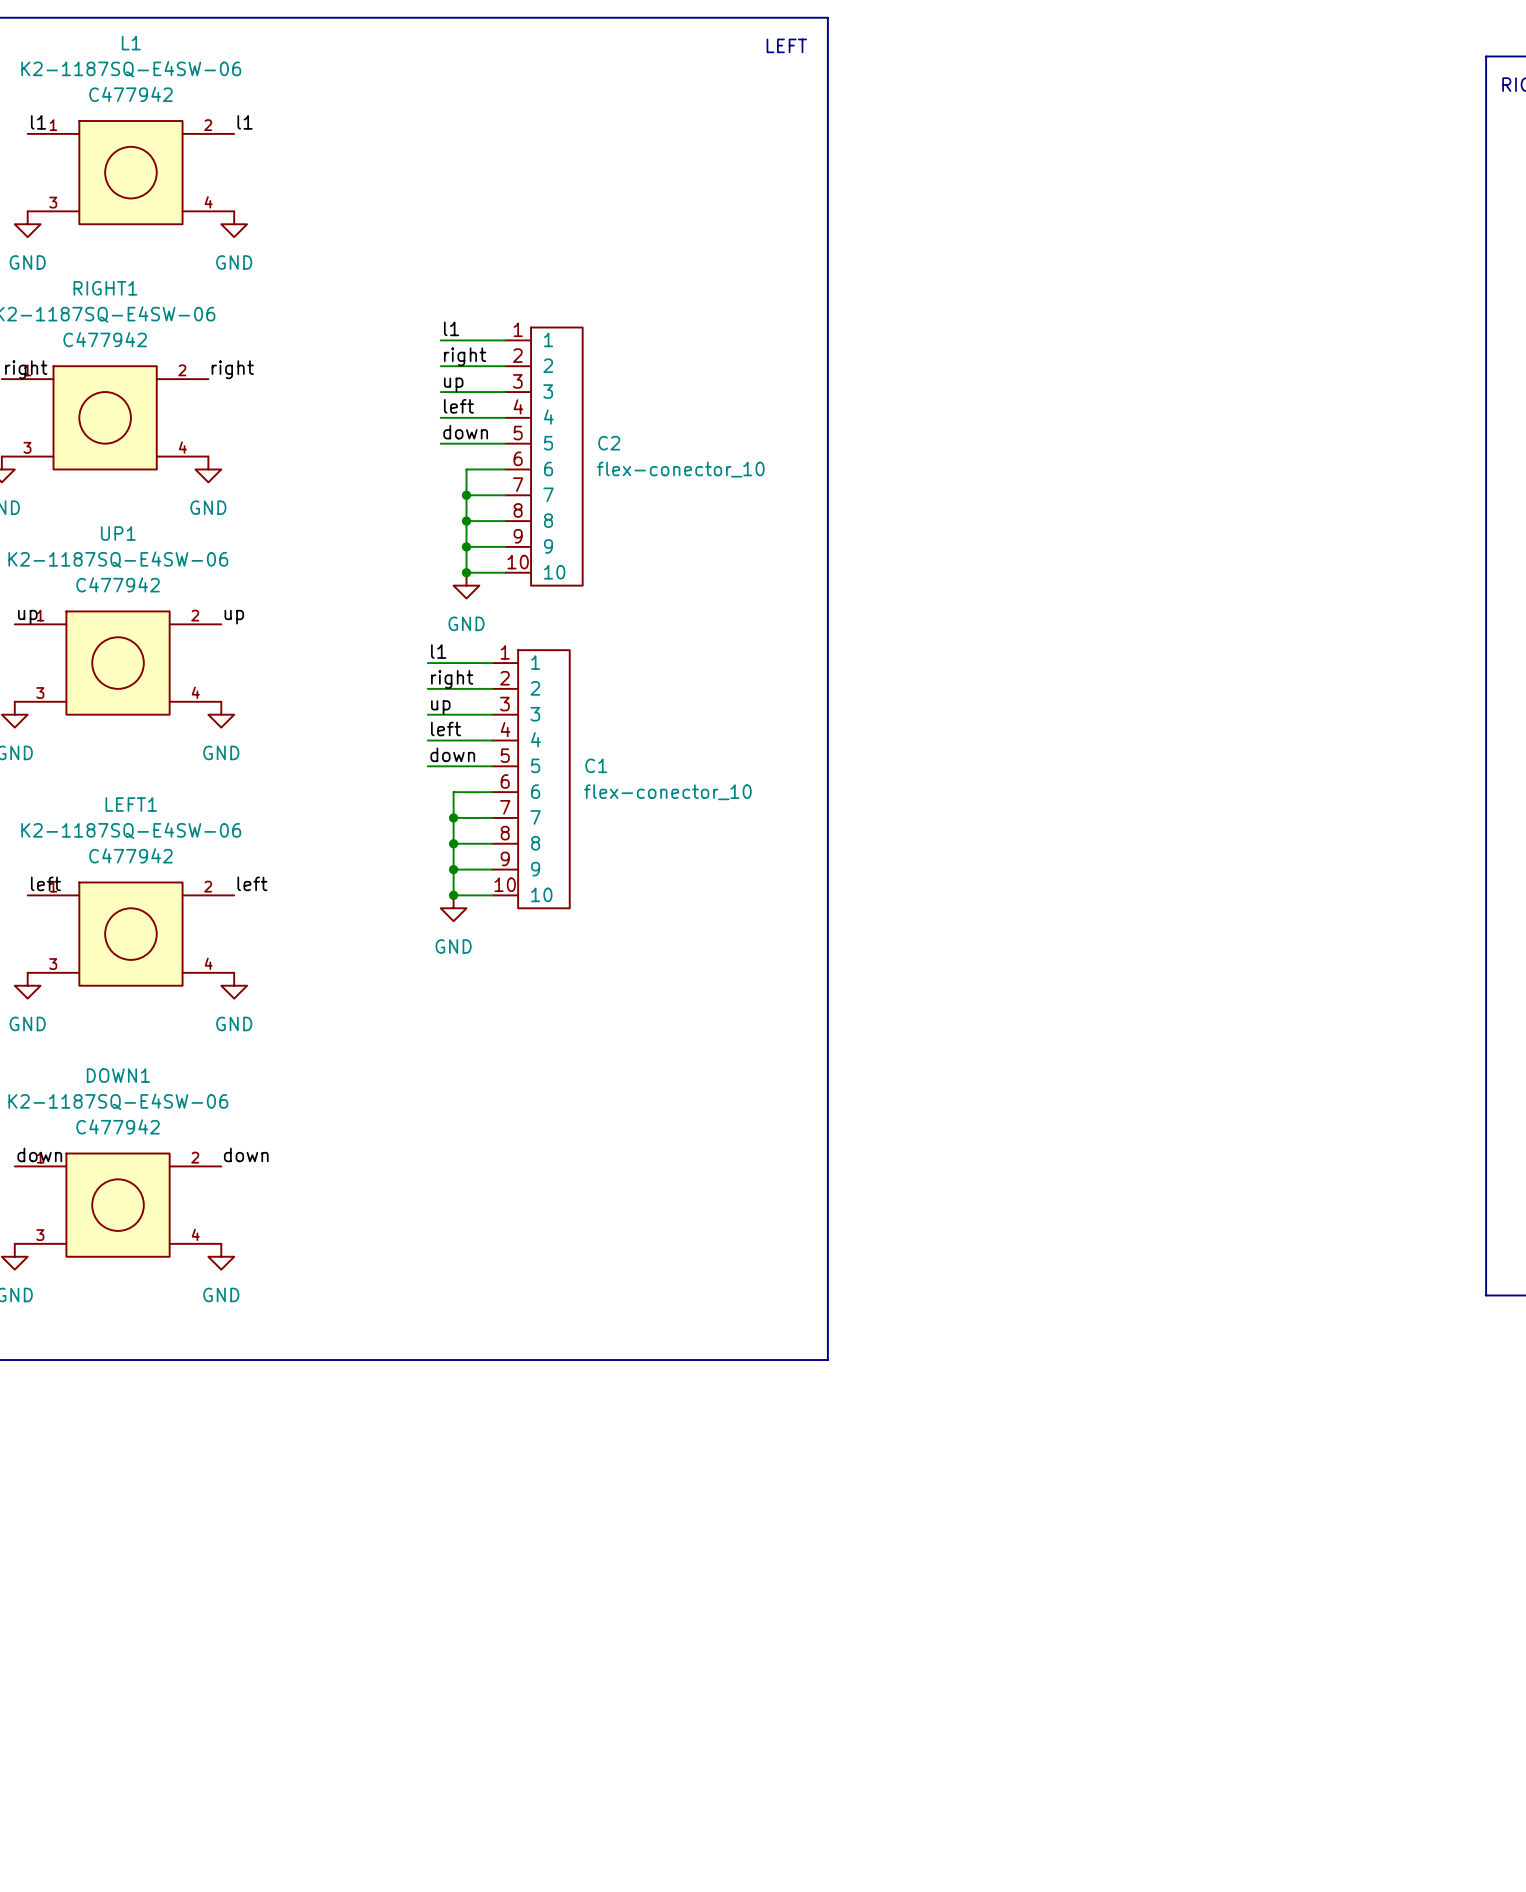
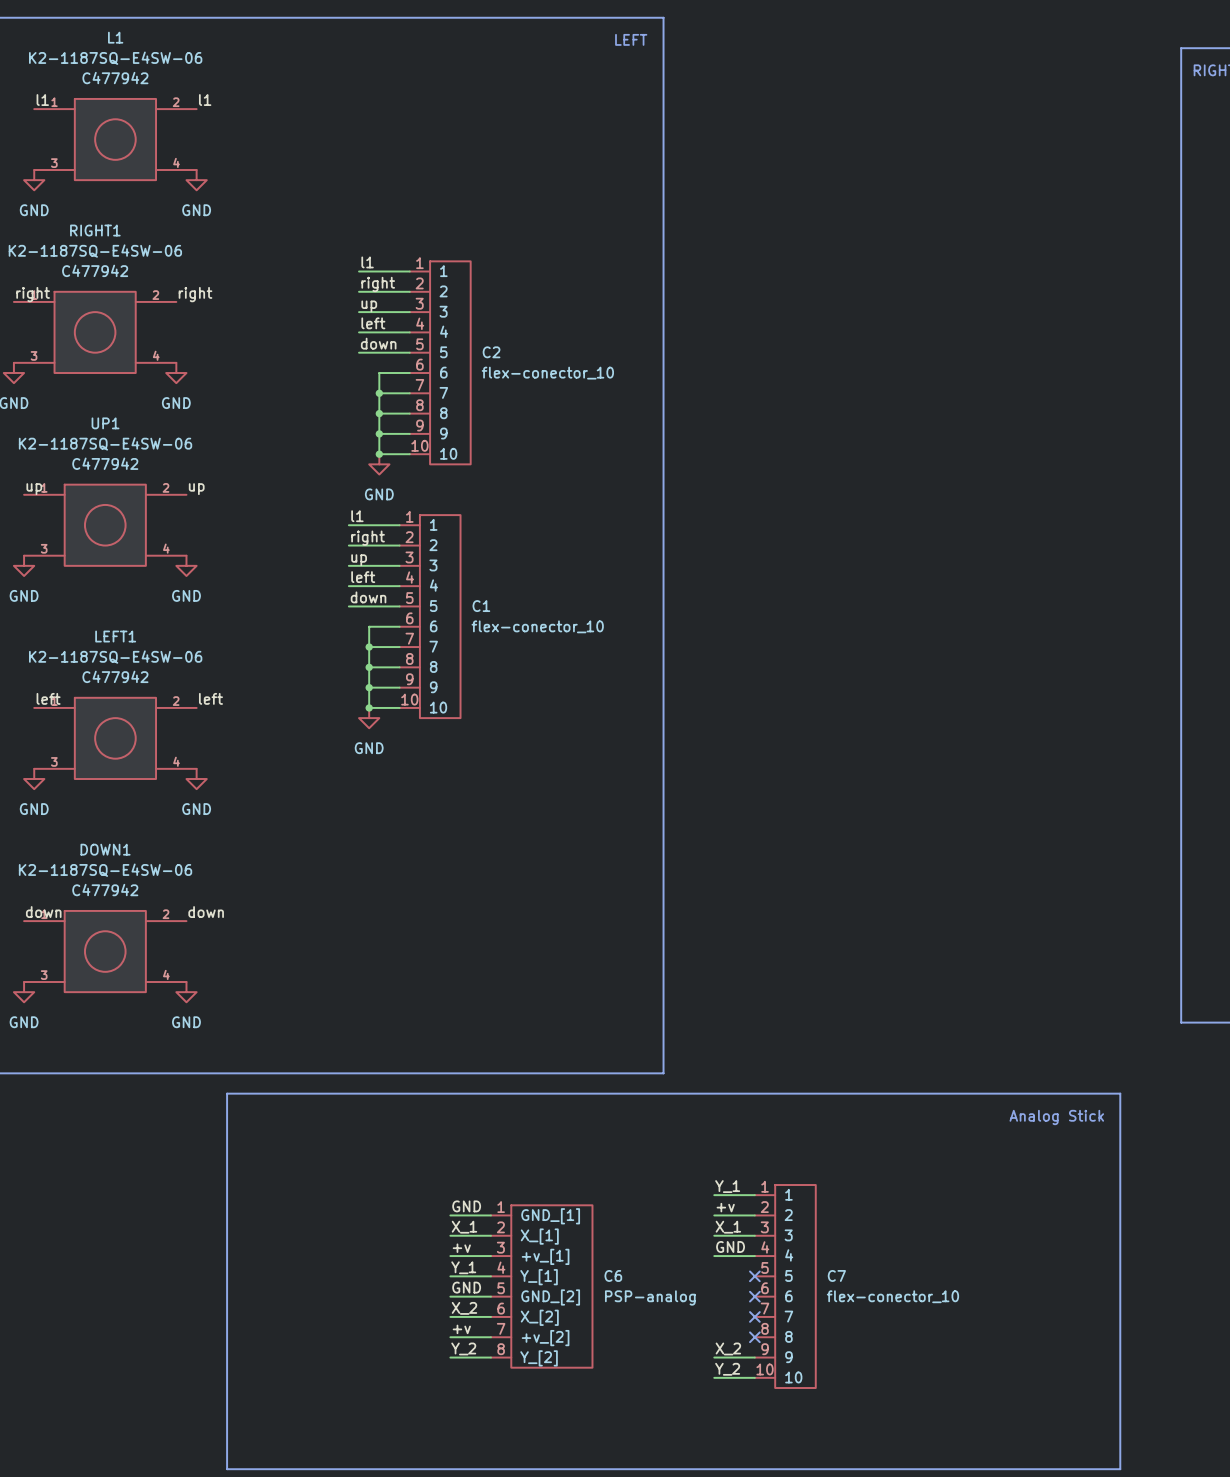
line: none -> (227, 1093) (1120, 1093) (1120, 1469) (227, 1469) (227, 1093)
text: none -> Analog Stick (1056, 1117)
label: none -> Y_1 (727, 1186)
wire: none -> (714, 1195) (754, 1195)
label: none -> GND (466, 1206)
label: none -> +v (725, 1207)
wire: none -> (450, 1215) (490, 1215)
wire: none -> (714, 1215) (754, 1215)
label: none -> X_1 (464, 1227)
label: none -> X_1 (728, 1227)
wire: none -> (450, 1235) (490, 1235)
wire: none -> (714, 1235) (754, 1235)
label: none -> GND (730, 1246)
label: none -> +v (461, 1248)
wire: none -> (450, 1256) (490, 1256)
wire: none -> (714, 1256) (754, 1256)
label: none -> Y_1 (463, 1267)
wire: none -> (450, 1276) (490, 1276)
no-connect mark: none -> (754, 1276)
C6: none -> PSP-analog (541, 1286)
C7: none -> flex-conector_10 (785, 1286)
label: none -> GND (466, 1287)
wire: none -> (450, 1296) (490, 1296)
no-connect mark: none -> (754, 1296)
label: none -> X_2 (464, 1308)
wire: none -> (450, 1316) (490, 1316)
no-connect mark: none -> (754, 1316)
label: none -> +v (461, 1329)
wire: none -> (450, 1337) (490, 1337)
no-connect mark: none -> (754, 1337)
label: none -> Y_2 (463, 1348)
label: none -> X_2 (728, 1348)
wire: none -> (450, 1357) (490, 1357)
wire: none -> (714, 1357) (754, 1357)
label: none -> Y_2 (727, 1369)
wire: none -> (714, 1377) (754, 1377)

